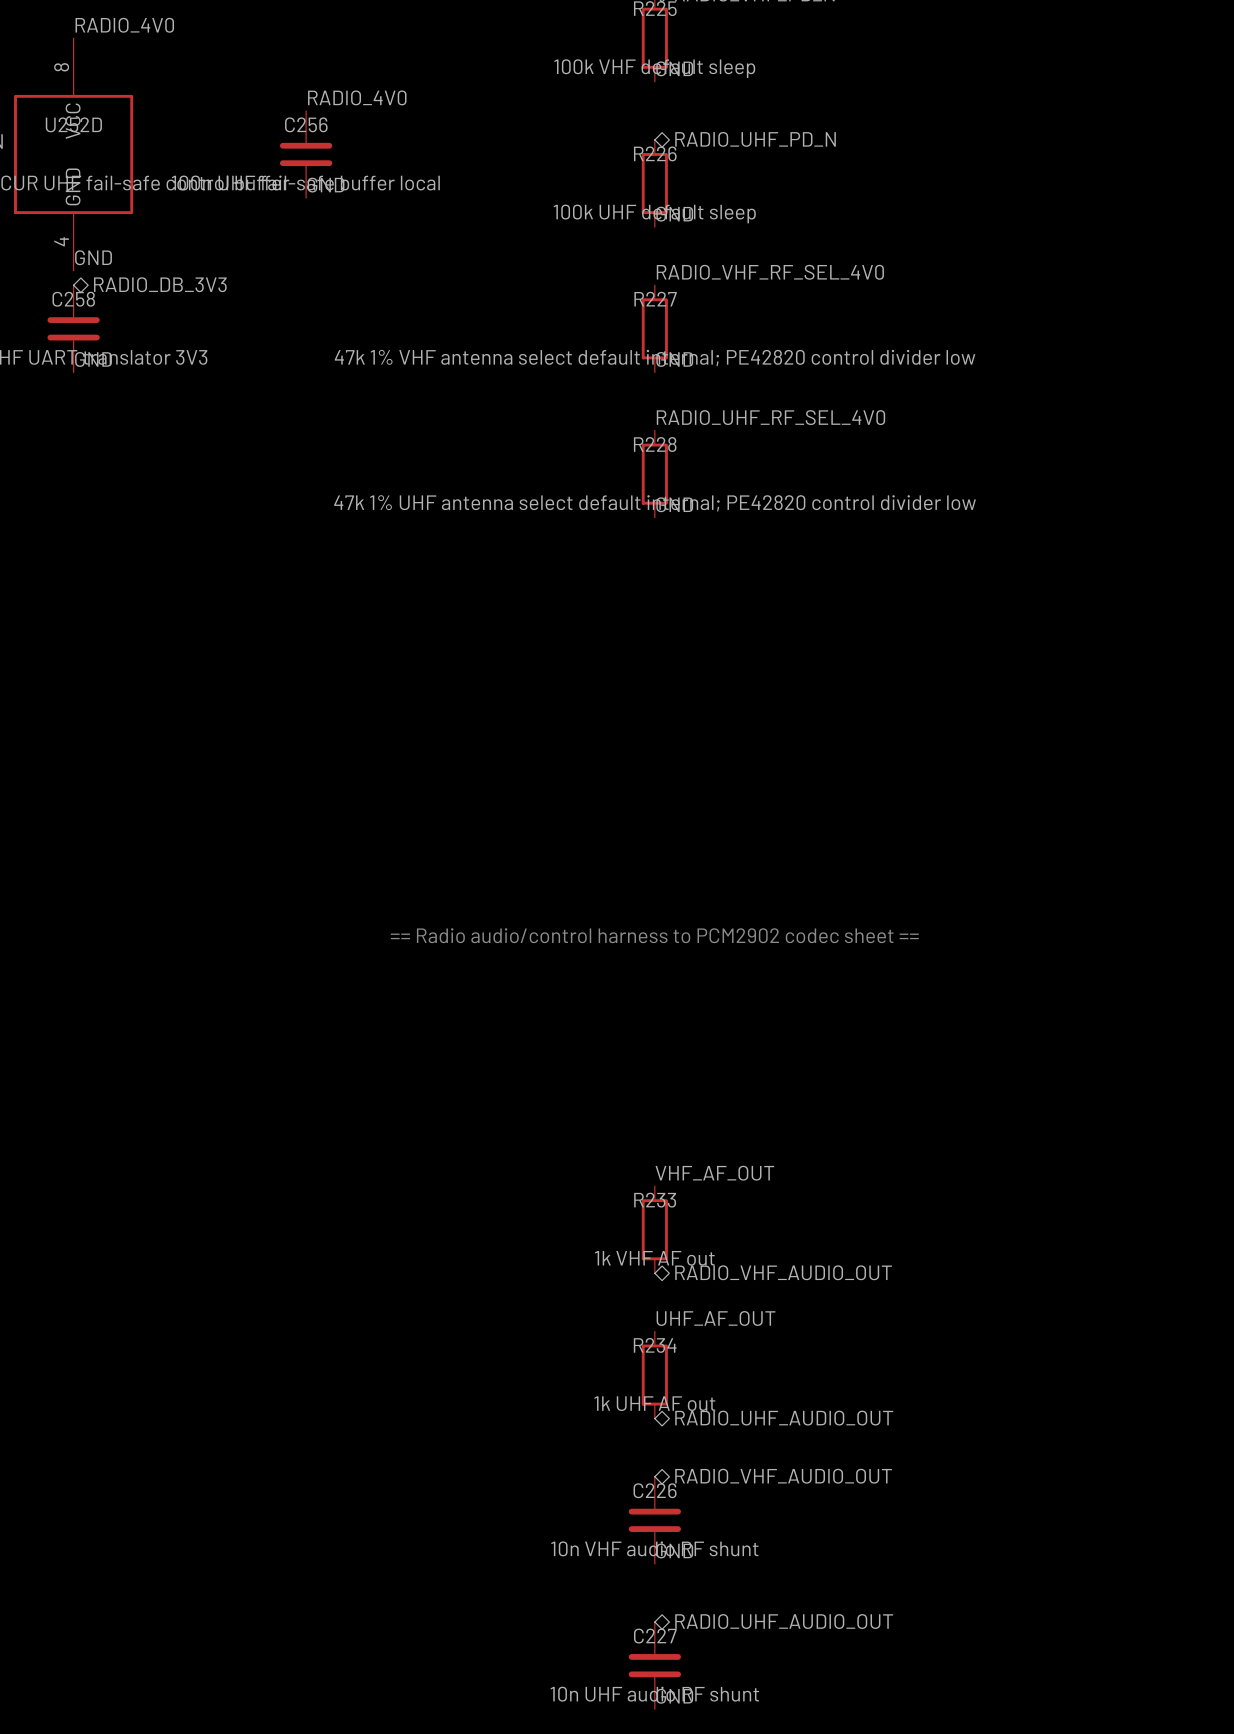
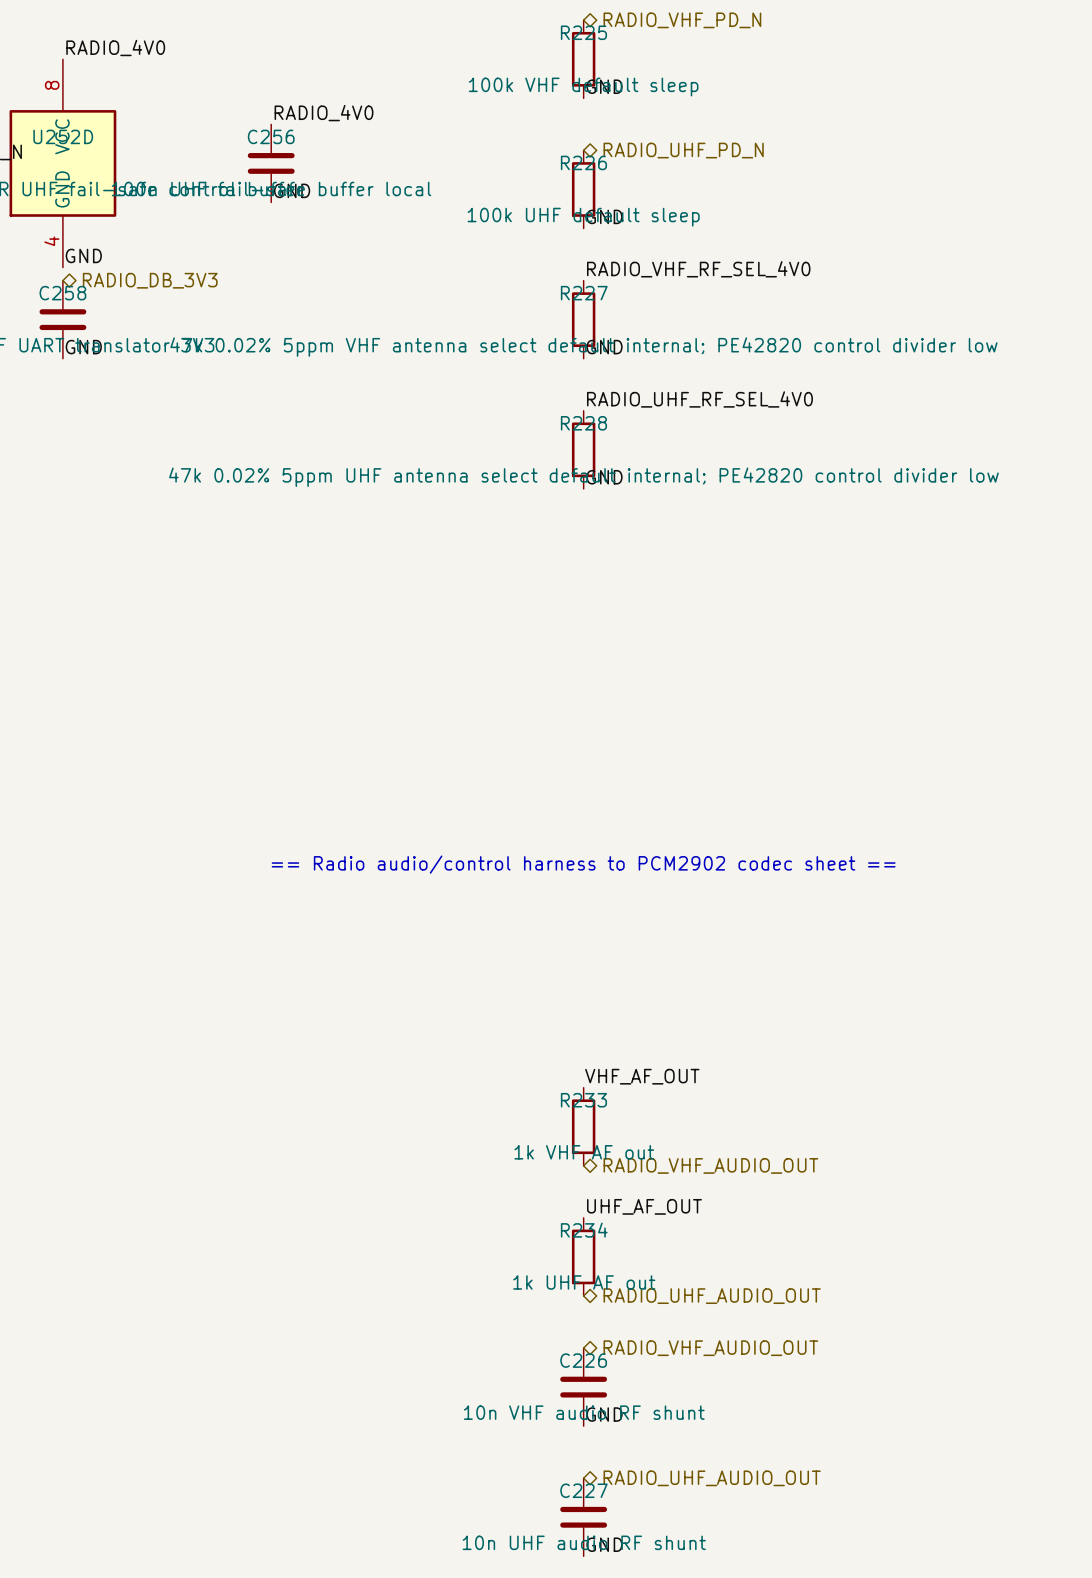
R227 value: 47k 1% VHF antenna select default internal; PE42820 control divider low (655, 358) -> 47k 0.02% 5ppm VHF antenna select default internal; PE42820 control divider low (583, 347)
R228 value: 47k 1% UHF antenna select default internal; PE42820 control divider low (655, 503) -> 47k 0.02% 5ppm UHF antenna select default internal; PE42820 control divider low (583, 477)

